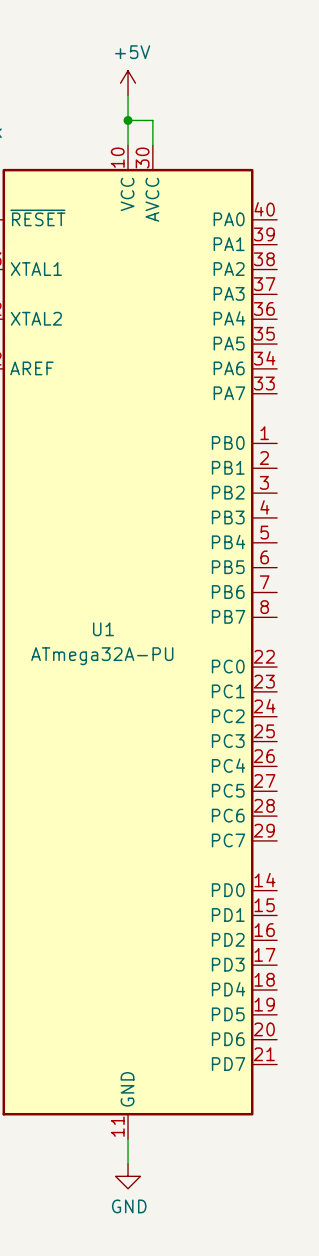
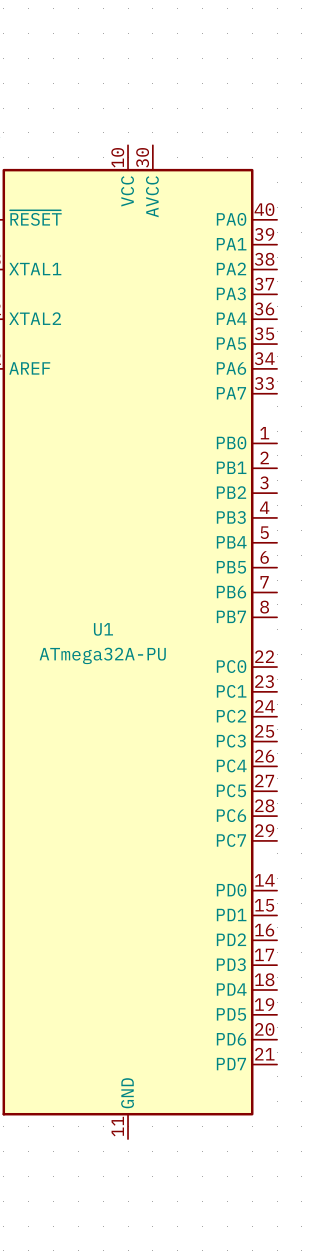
power symbol: +5V (128, 83) -> none
wire: (128, 95) (128, 145) -> none
wire: (128, 120) (152, 120) (152, 145) -> none
junction: (128, 120) -> none
wire: (128, 1139) (128, 1163) -> none
power symbol: GND (128, 1176) -> none

